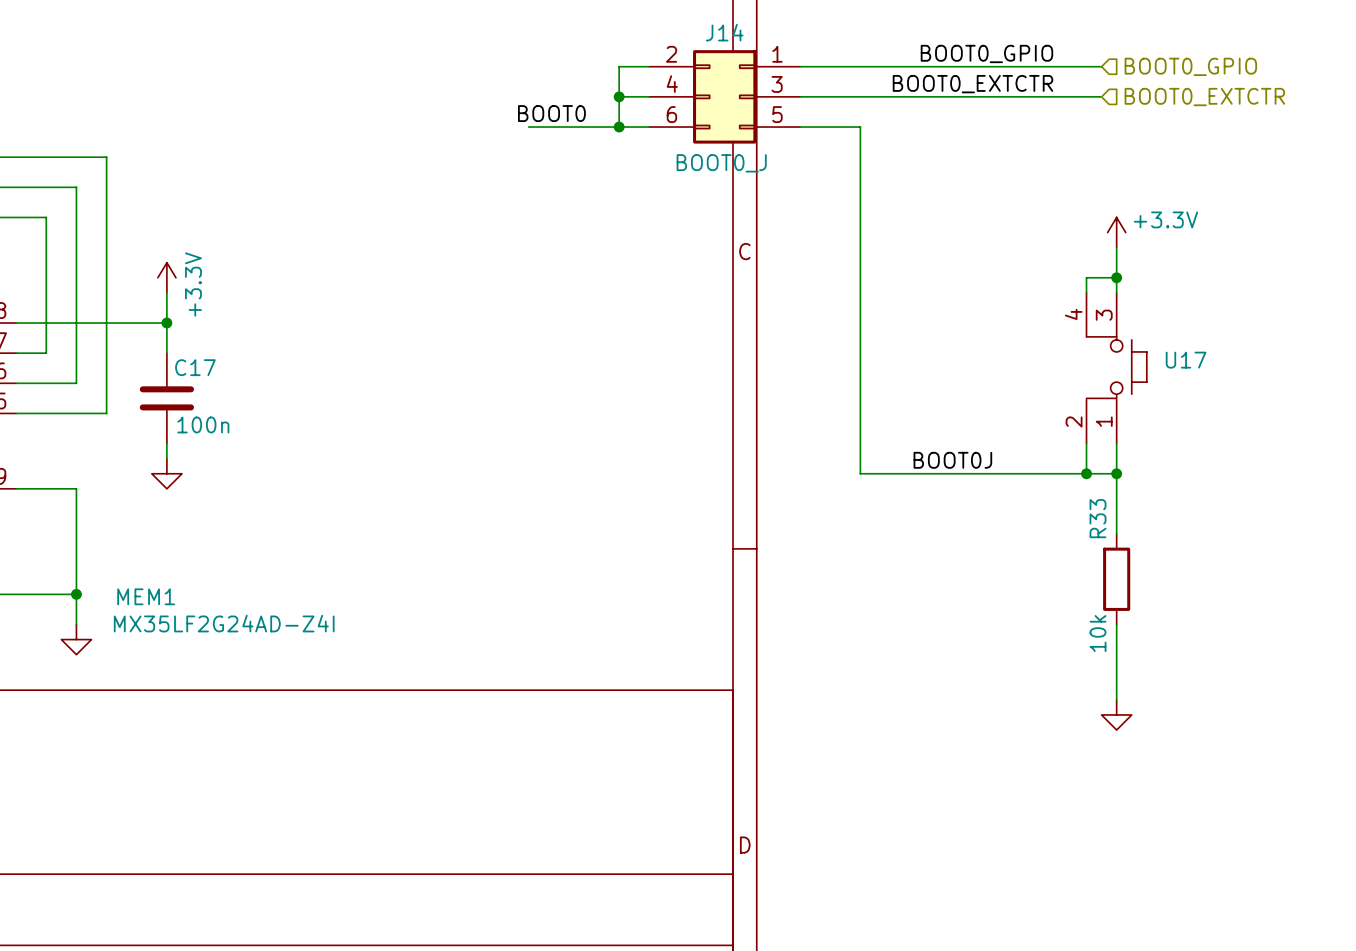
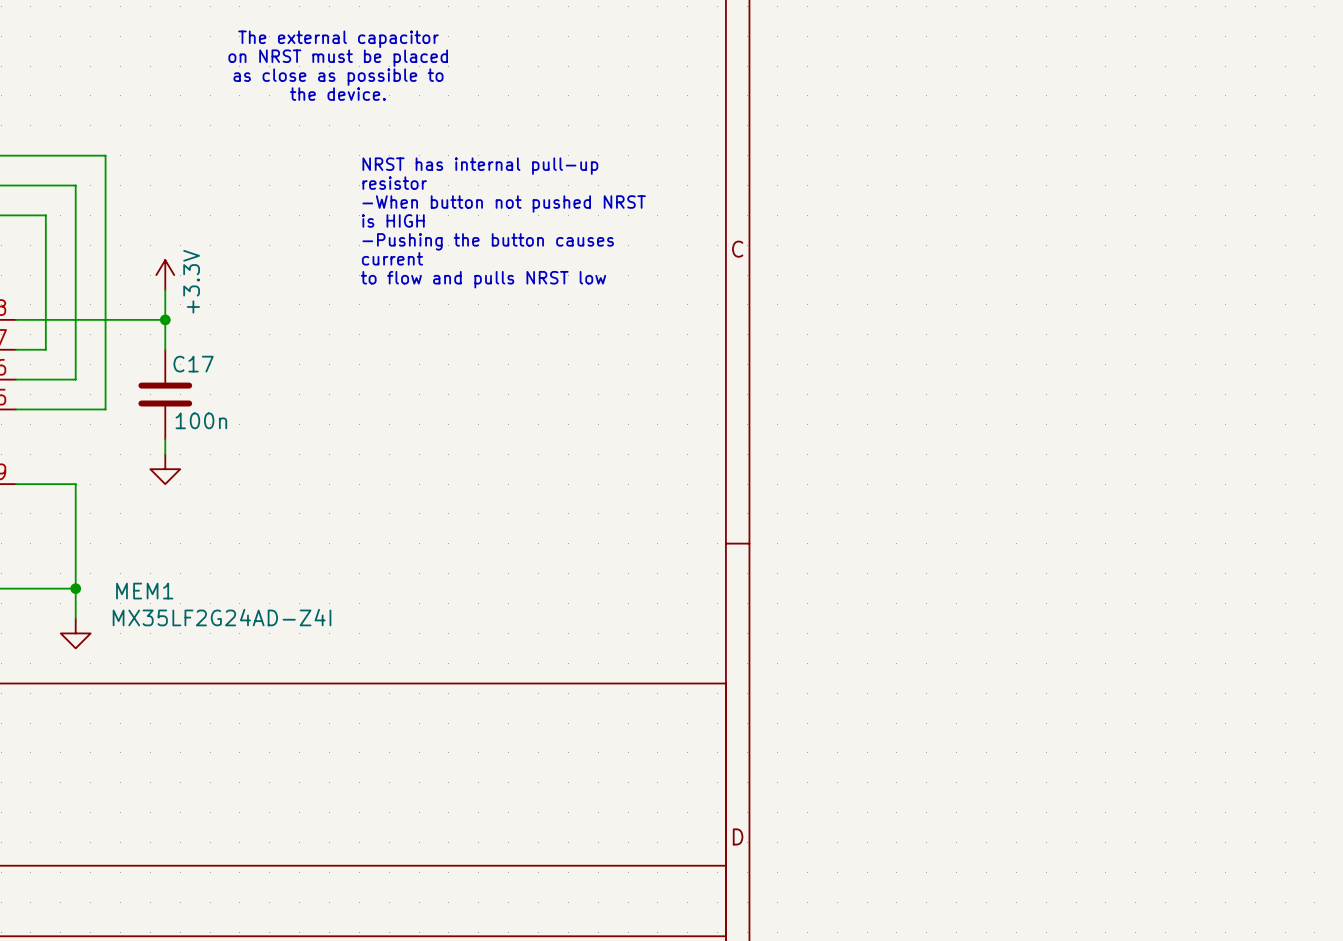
text: none -> The external capacitor (338, 39)
label: BOOT0_GPIO (986, 53) -> none
text: none -> on NRST must be placed (338, 58)
wire: (649, 66) (619, 66) (619, 127) -> none
wire: (800, 66) (1101, 66) -> none
hierarchical label: BOOT0_GPIO (1190, 66) -> none
text: none -> as close as possible to (338, 77)
label: BOOT0_EXTCTR (972, 84) -> none
text: none -> the device. (337, 94)
wire: (619, 96) (649, 96) -> none
junction: (619, 96) -> none
J14: BOOT0_J (724, 96) -> none
wire: (800, 96) (1101, 96) -> none
hierarchical label: BOOT0_EXTCTR (1204, 97) -> none
label: BOOT0 (551, 113) -> none
wire: (528, 127) (649, 127) -> none
junction: (619, 127) -> none
wire: (800, 127) (860, 127) (860, 473) (1116, 473) -> none
text: none -> NRST has internal pull-up (480, 166)
text: none -> resistor (394, 183)
text: none -> -When button not pushed NRST (504, 203)
text: none -> is HIGH (393, 220)
power symbol: +3.3V (1116, 232) -> none
text: none -> -Pushing the button causes (488, 241)
wire: (1116, 247) (1116, 292) -> none
text: none -> current (392, 258)
wire: (1116, 277) (1086, 277) (1086, 292) -> none
junction: (1116, 277) -> none
text: none -> to flow and pulls NRST low (483, 279)
U17: (1116, 368) -> none
wire: (1086, 443) (1086, 473) -> none
wire: (1116, 443) (1116, 534) -> none
label: BOOT0J (952, 460) -> none
junction: (1086, 473) -> none
junction: (1116, 473) -> none
R33: 10k (1116, 579) -> none
wire: (1116, 624) (1116, 699) -> none
power symbol: (1116, 714) -> none

